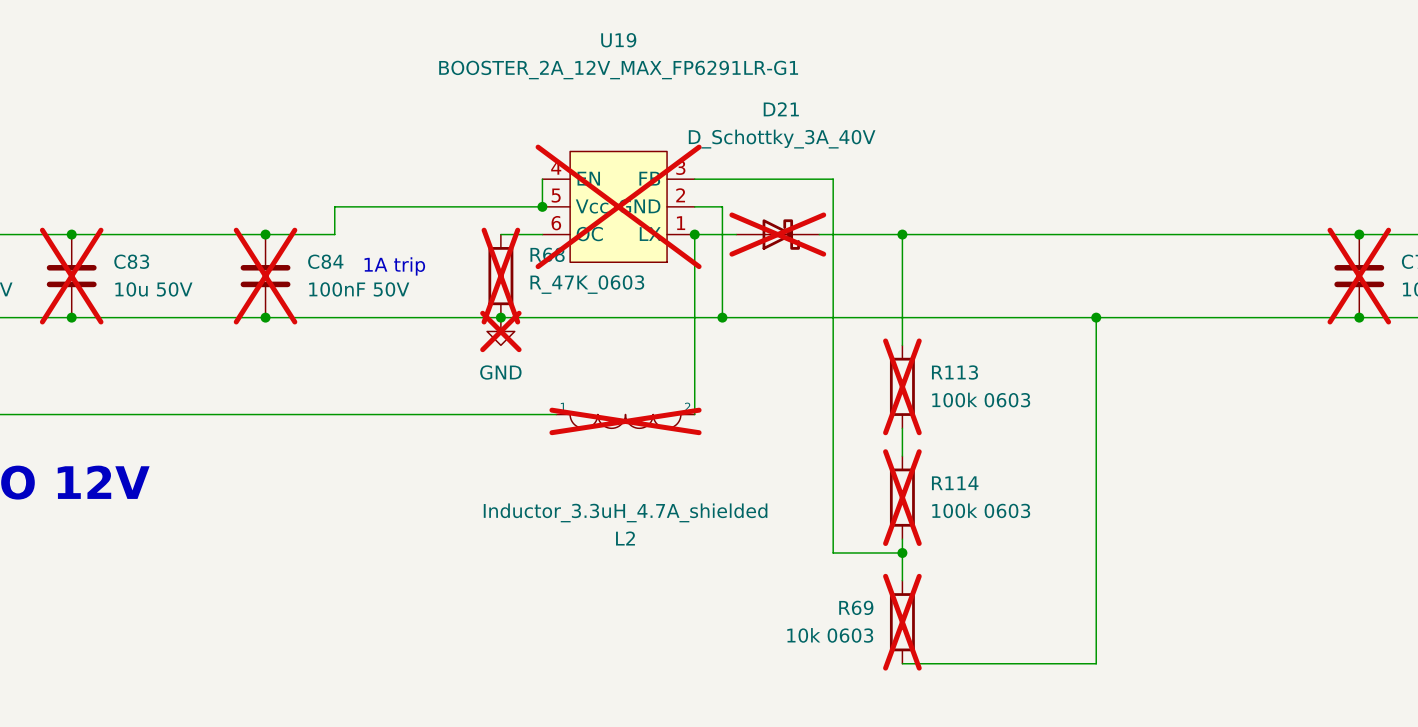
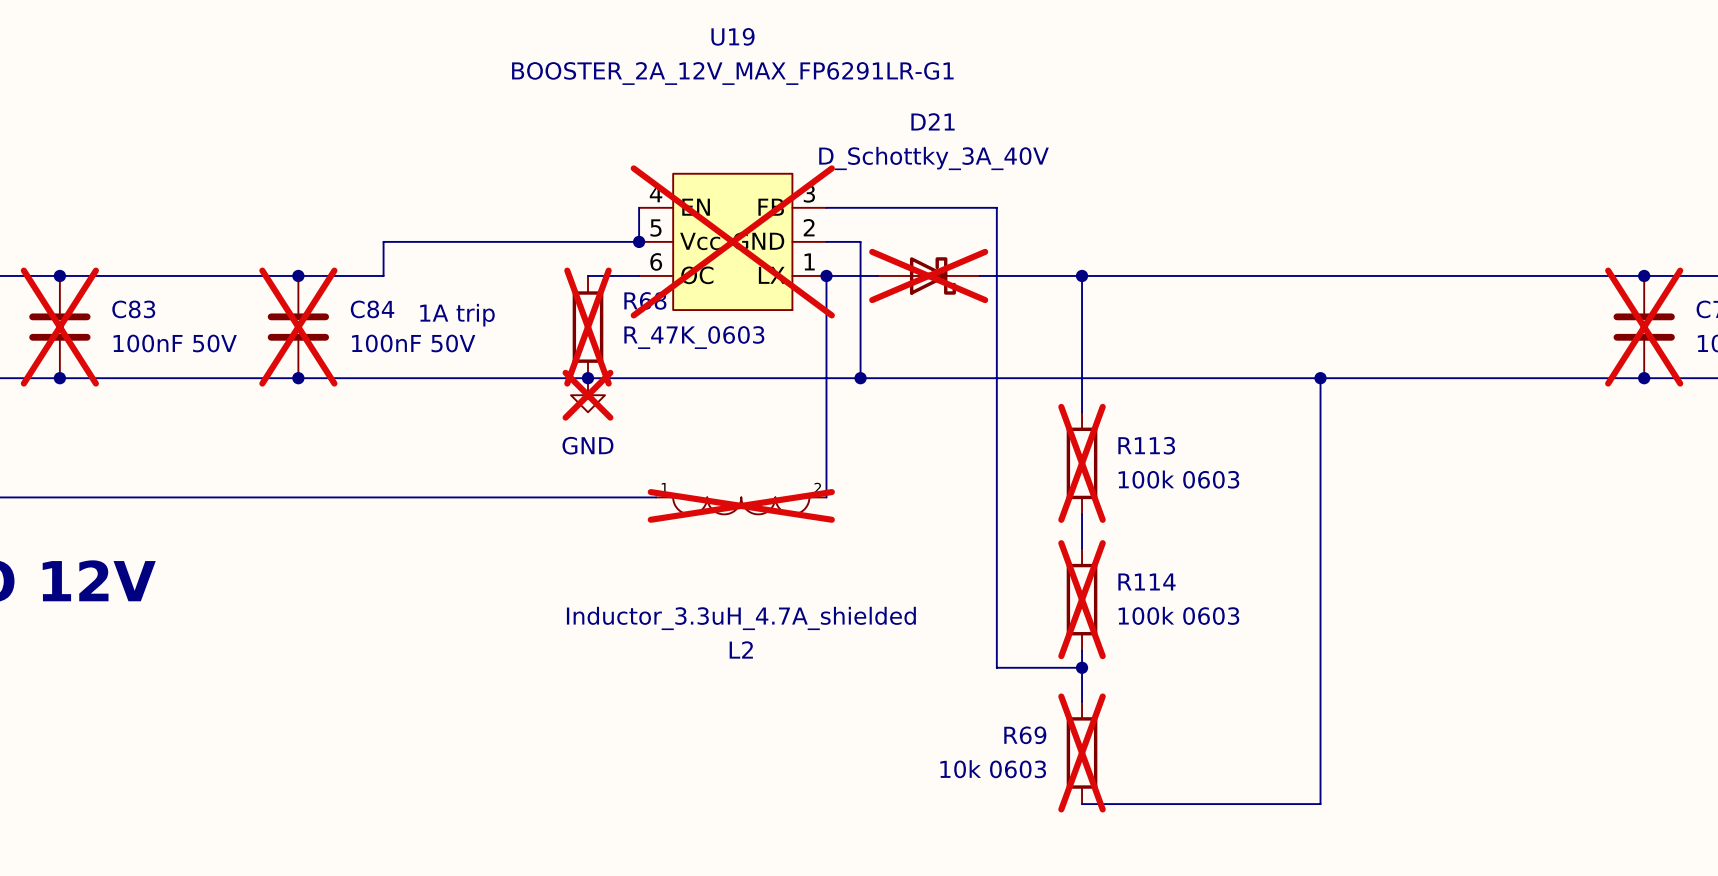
C83 value: 10u 50V (153, 289) -> 100nF 50V (175, 343)

